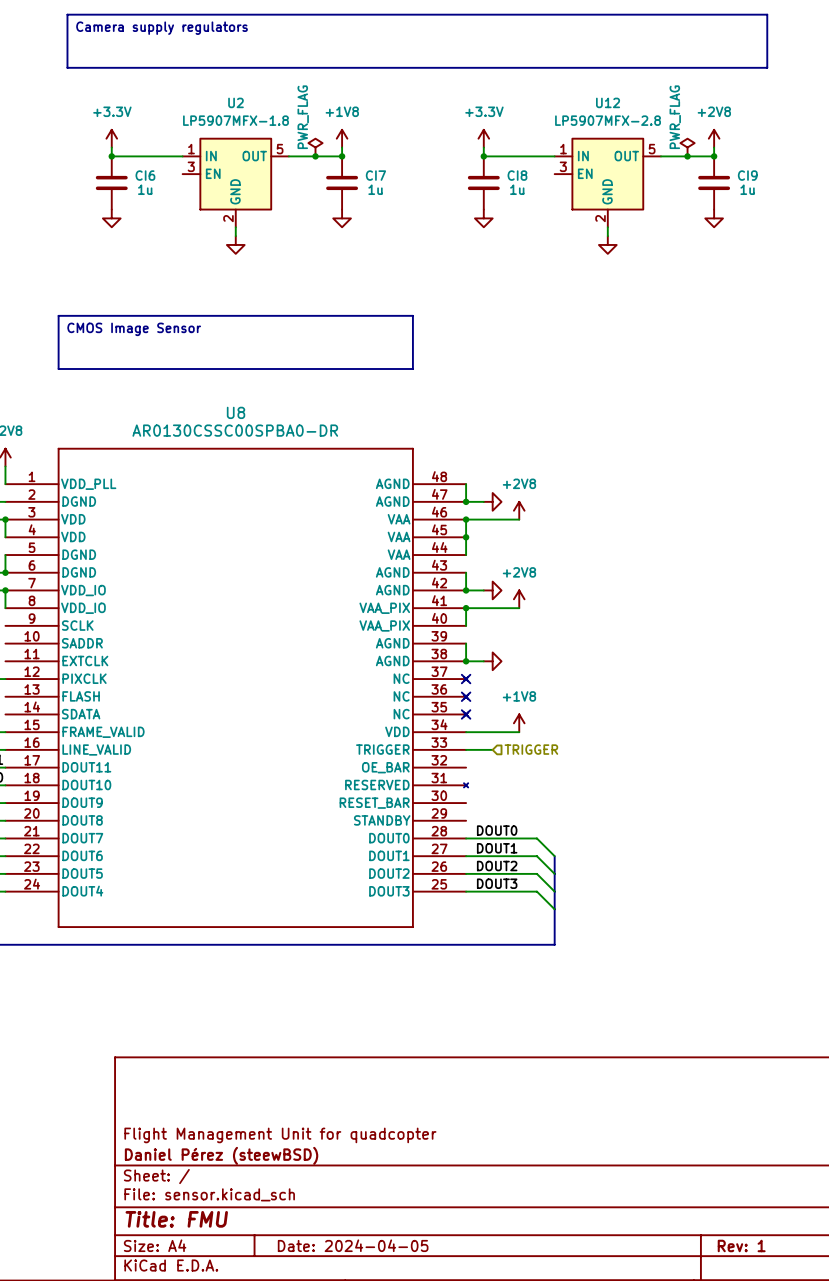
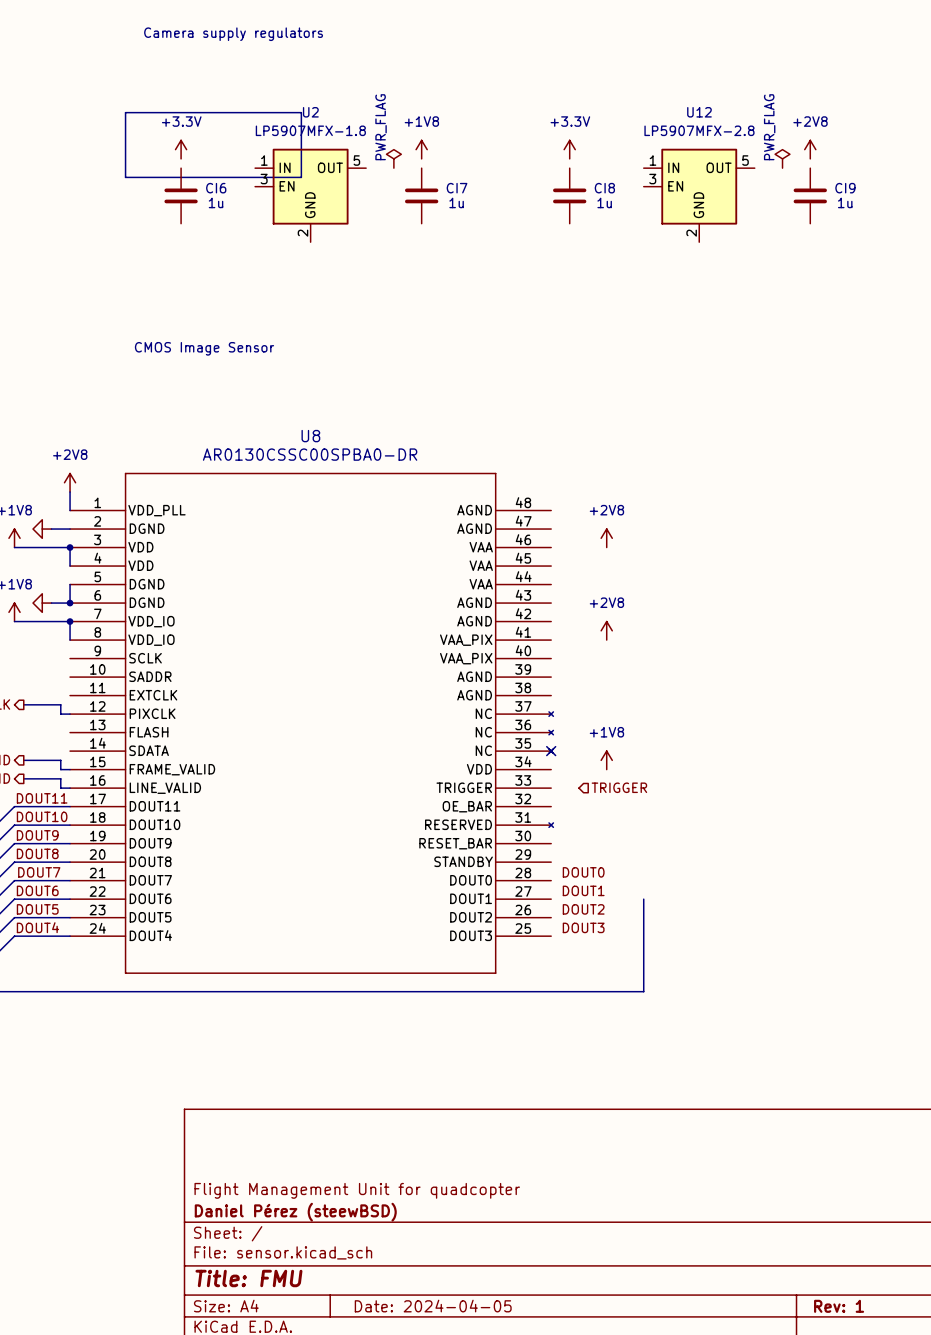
line: (67, 14) (767, 14) (767, 67) (67, 67) (67, 14) -> none
line: none -> (125, 112) (301, 112) (301, 177) (125, 177) (125, 112)
wire: (111, 147) (111, 156) (182, 156) -> none
wire: (342, 147) (342, 156) (288, 156) -> none
wire: (483, 147) (483, 156) (554, 156) -> none
wire: (714, 147) (714, 156) (660, 156) -> none
junction: (111, 156) -> none
junction: (315, 156) -> none
junction: (342, 156) -> none
junction: (483, 156) -> none
junction: (687, 156) -> none
junction: (714, 156) -> none
power symbol: (111, 218) -> none
power symbol: (342, 218) -> none
power symbol: (483, 218) -> none
power symbol: (714, 218) -> none
wire: (235, 227) (235, 236) -> none
wire: (607, 227) (607, 236) -> none
power symbol: (235, 244) -> none
power symbol: (607, 244) -> none
line: (58, 315) (412, 315) (412, 369) (58, 369) (58, 315) -> none
wire: (466, 484) (466, 501) (483, 501) -> none
junction: (466, 501) -> none
power symbol: (492, 501) -> none
junction: (466, 519) -> none
wire: (519, 519) (466, 519) (466, 555) -> none
junction: (466, 537) -> none
wire: (466, 572) (466, 590) (483, 590) -> none
junction: (466, 590) -> none
power symbol: (492, 590) -> none
junction: (466, 608) -> none
wire: (519, 608) (466, 608) (466, 625) -> none
wire: (466, 643) (466, 661) (483, 661) -> none
junction: (466, 661) -> none
power symbol: (492, 661) -> none
no-connect mark: (466, 679) -> none
no-connect mark: (466, 696) -> none
wire: (466, 732) (519, 732) -> none
wire: (466, 749) (492, 749) -> none
wire: (466, 838) (536, 838) (554, 856) -> none
wire: (466, 856) (536, 856) (554, 873) -> none
wire: (466, 873) (536, 873) (554, 891) -> none
wire: (466, 891) (536, 891) (554, 909) -> none

